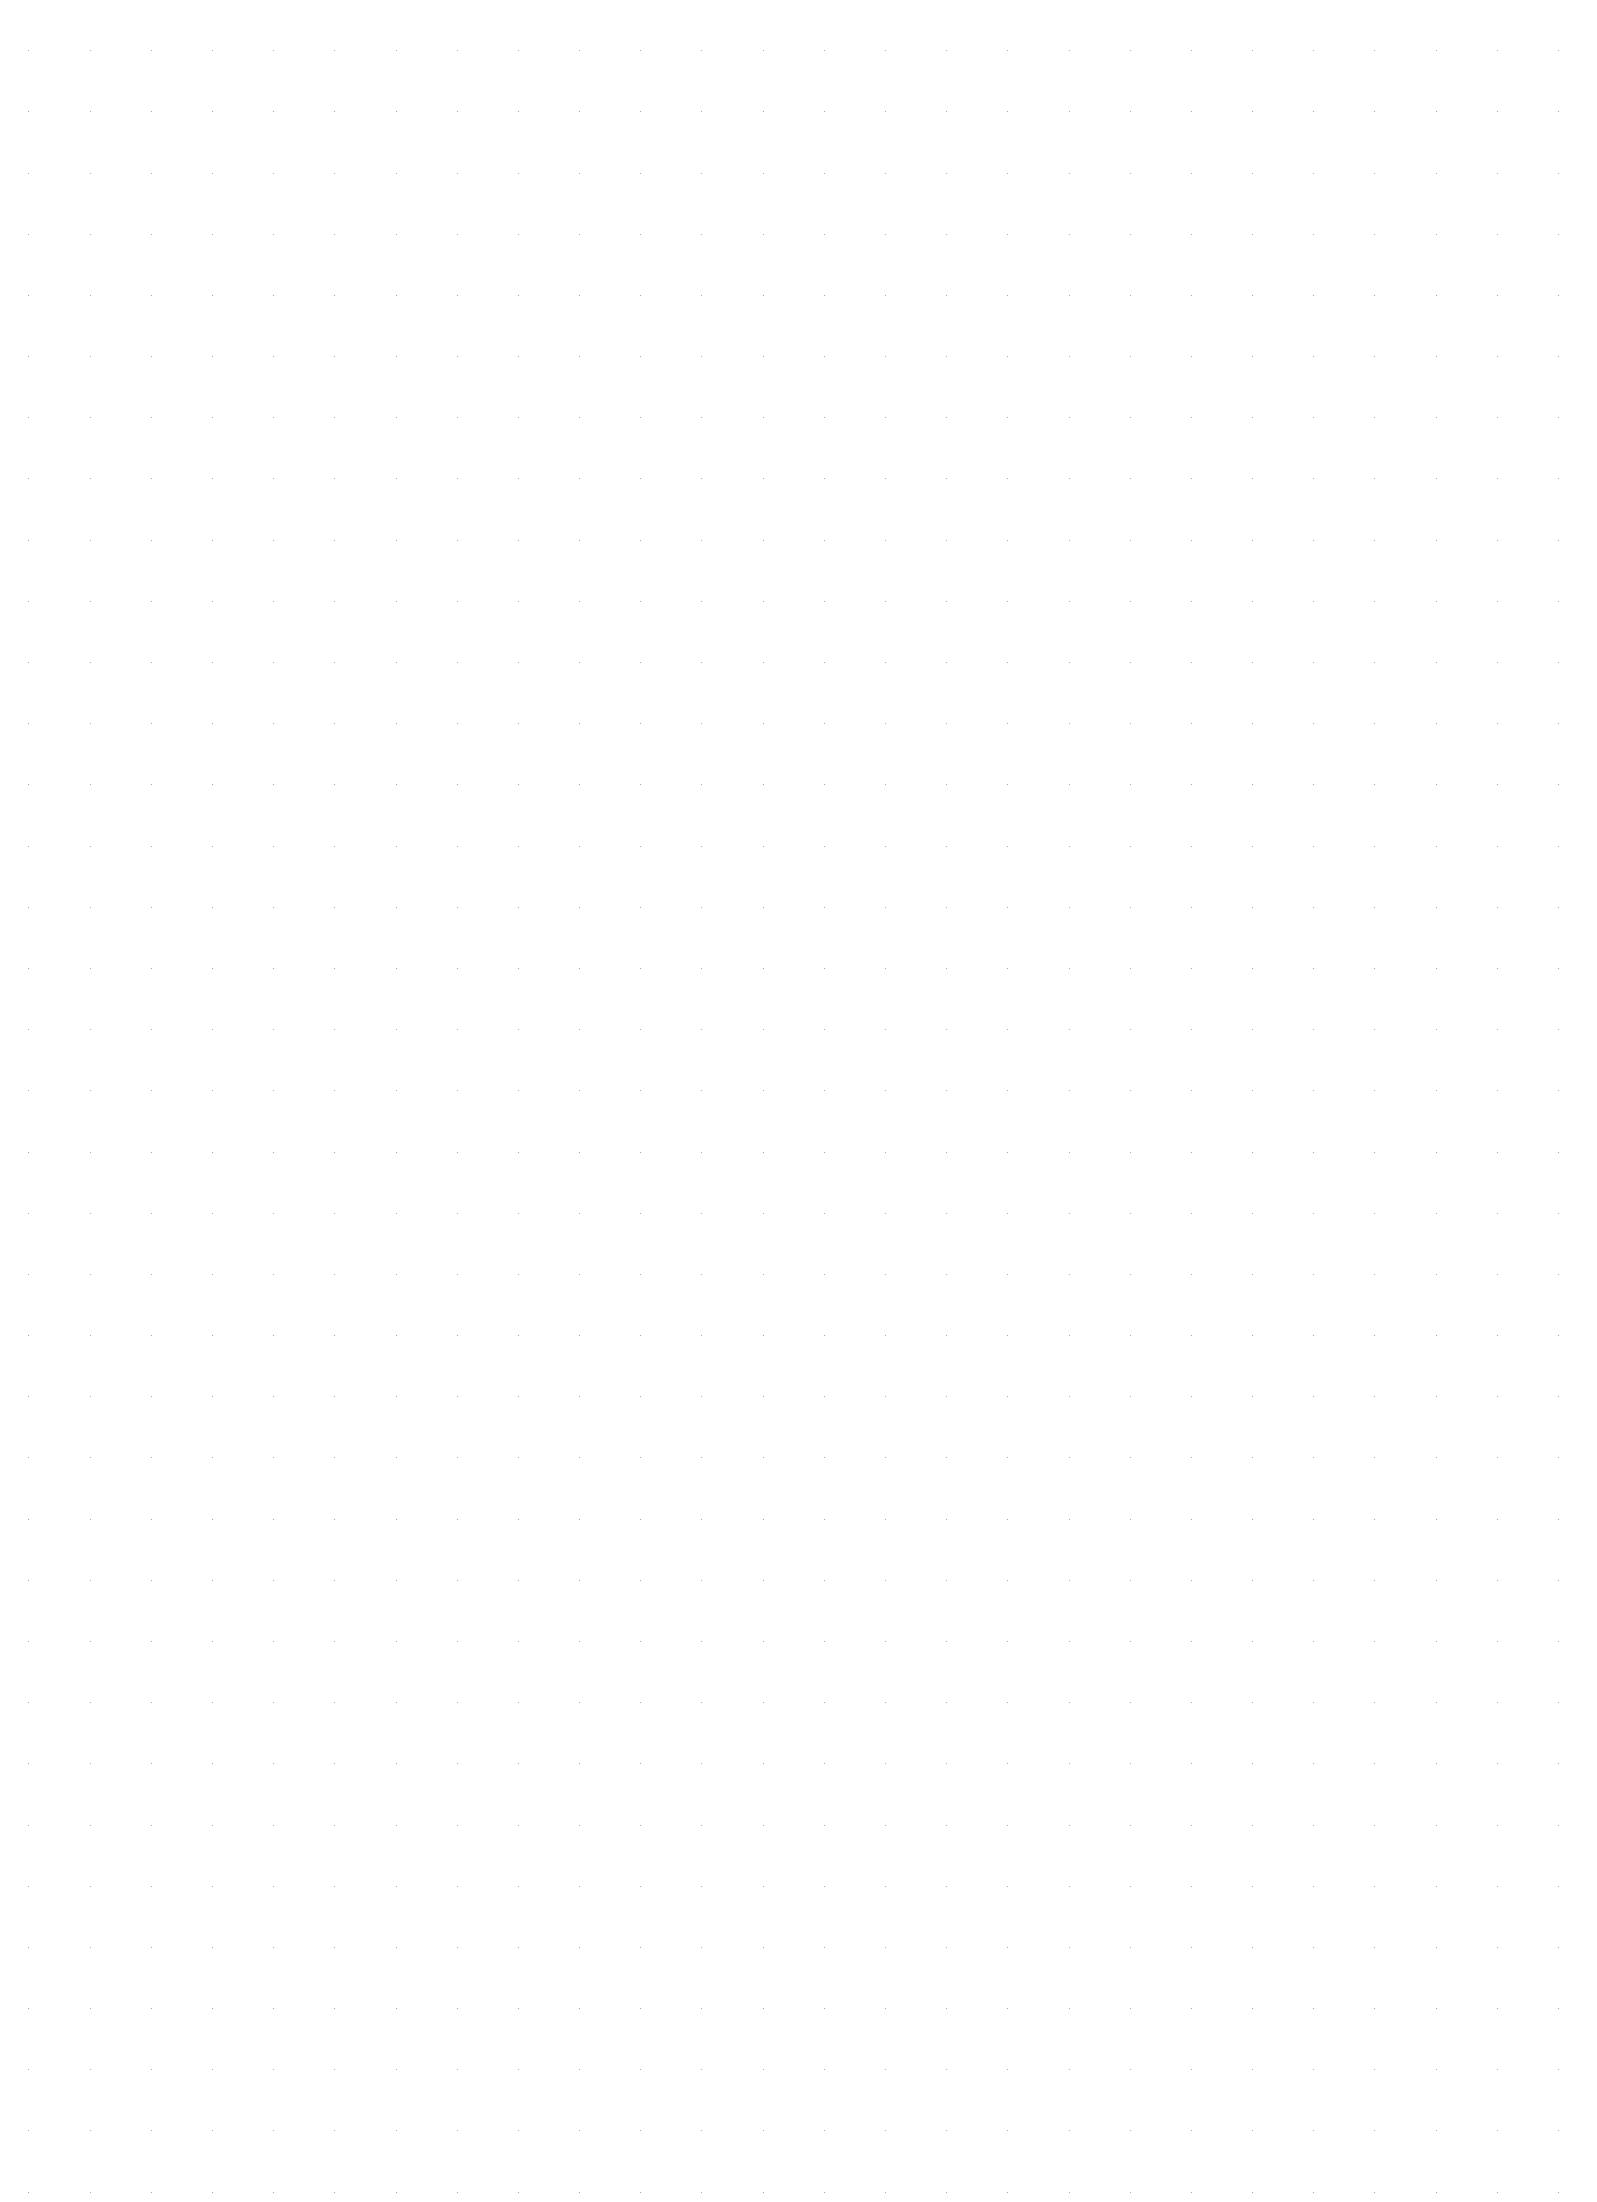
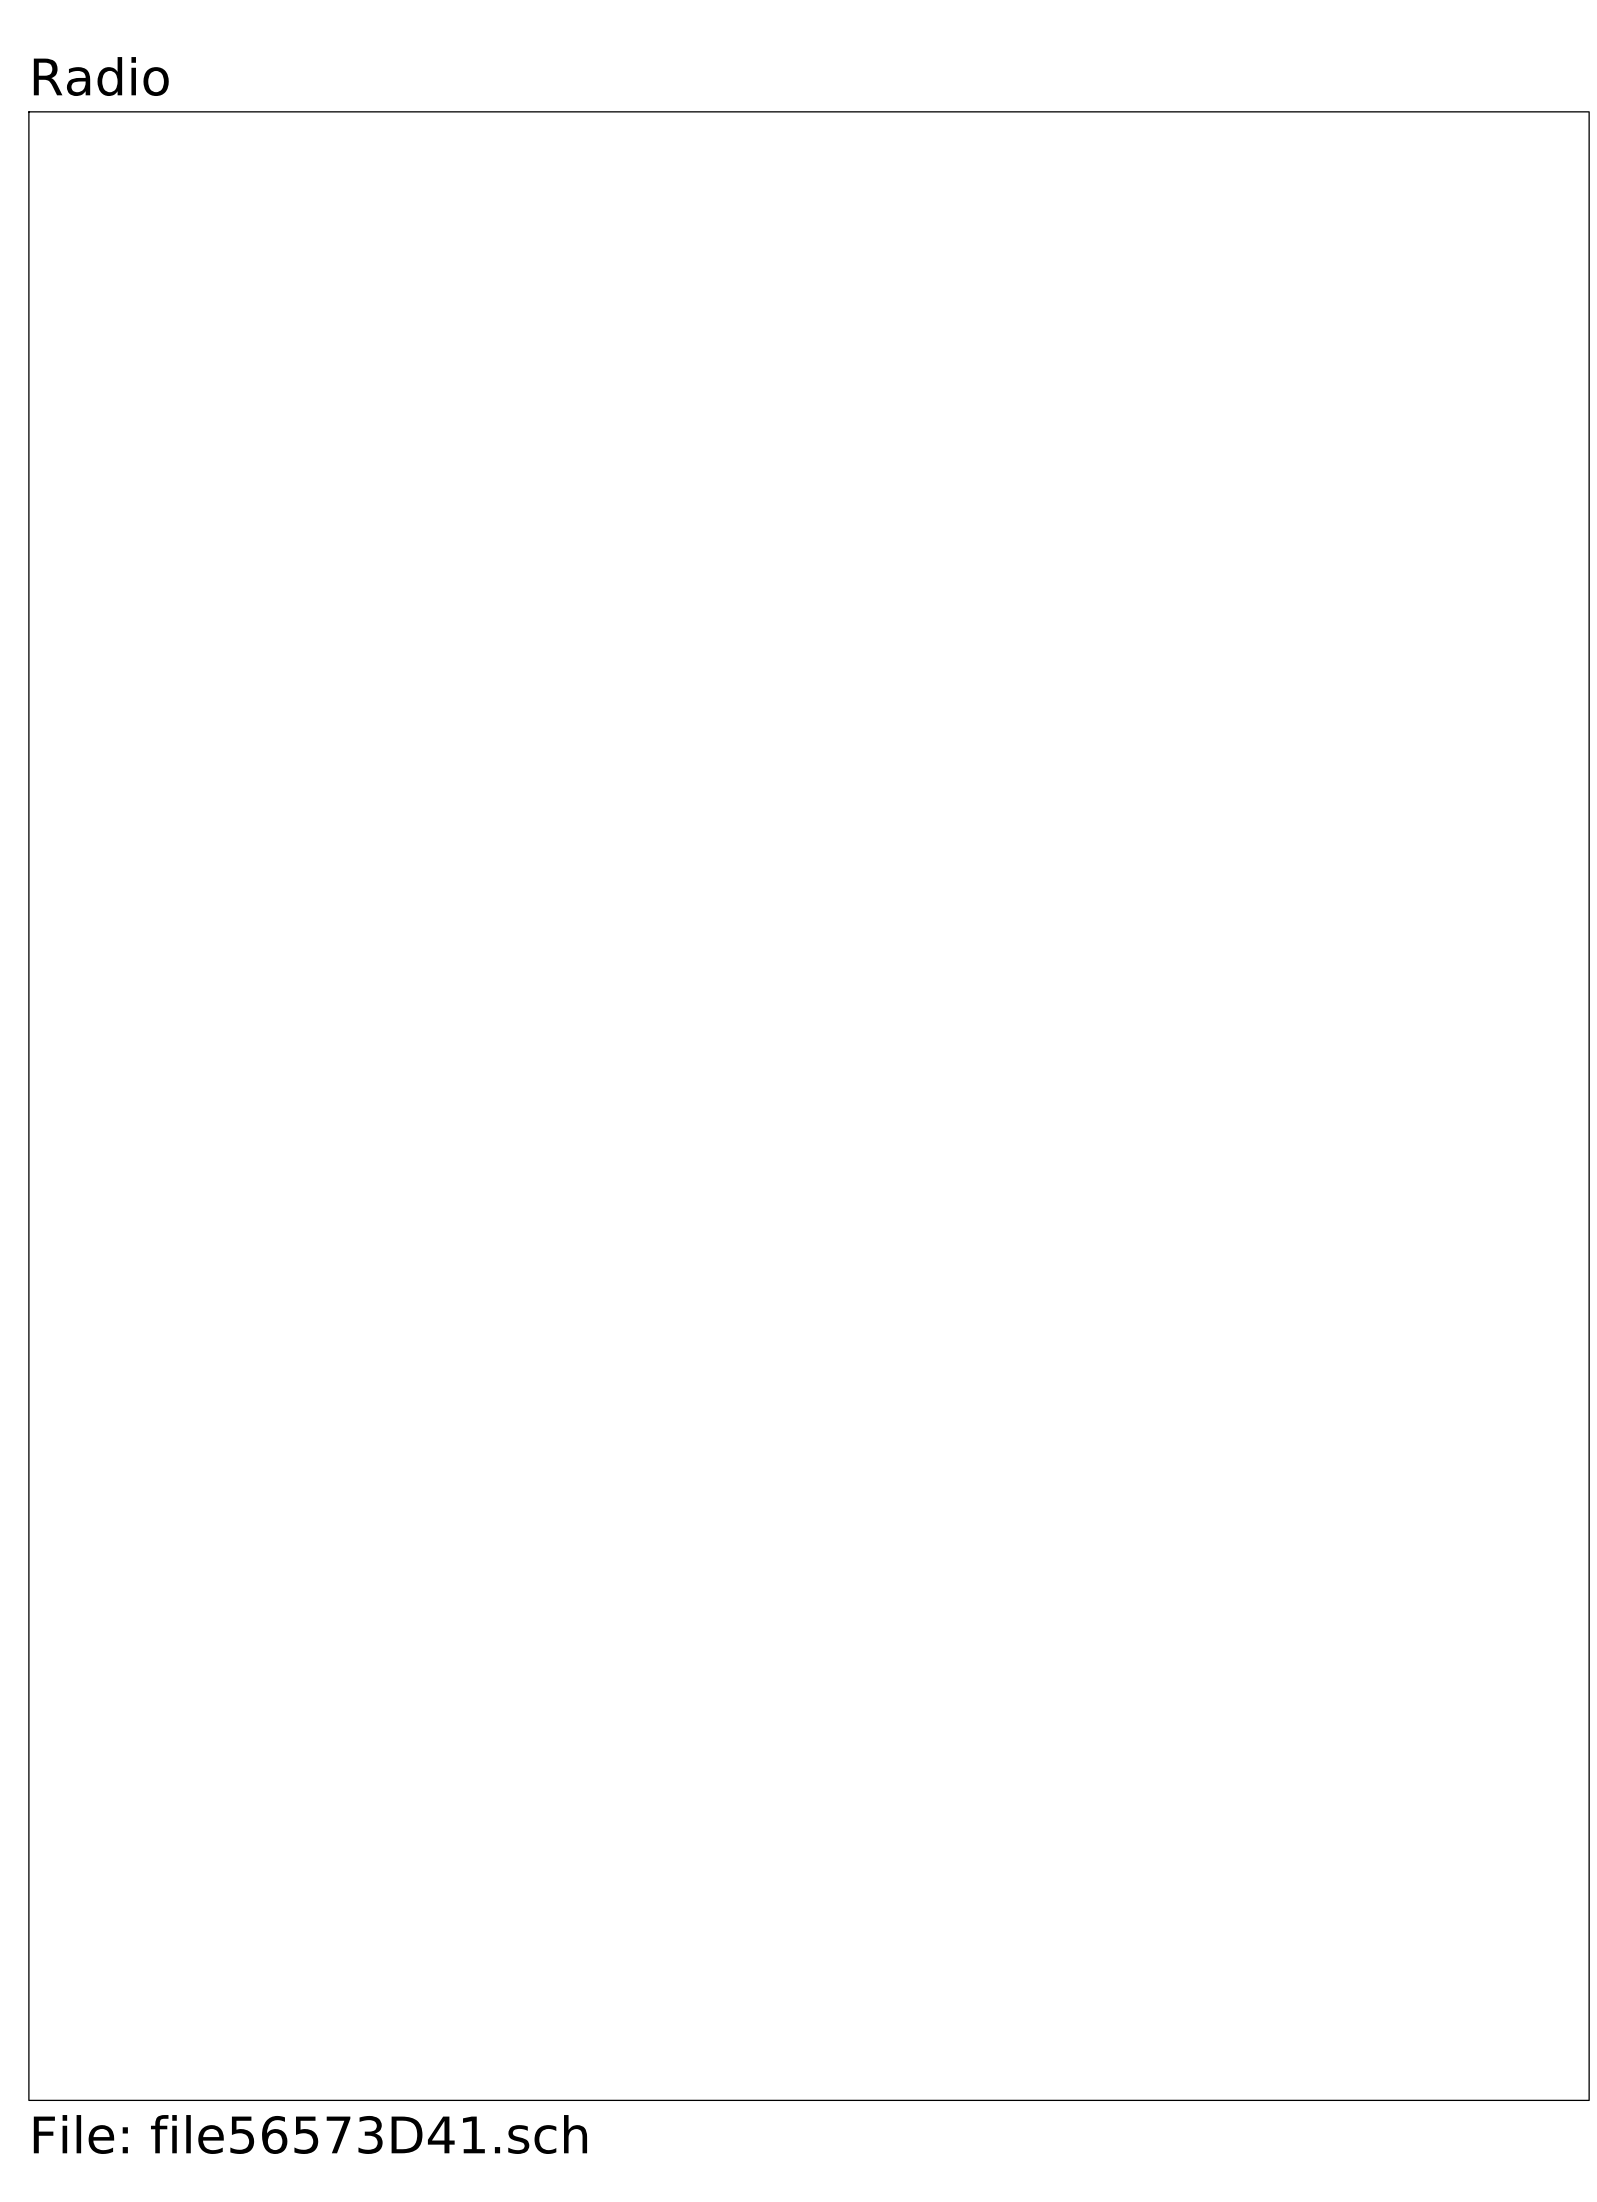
sheet Radio: none -> File: file56573D41.sch (809, 1106)

